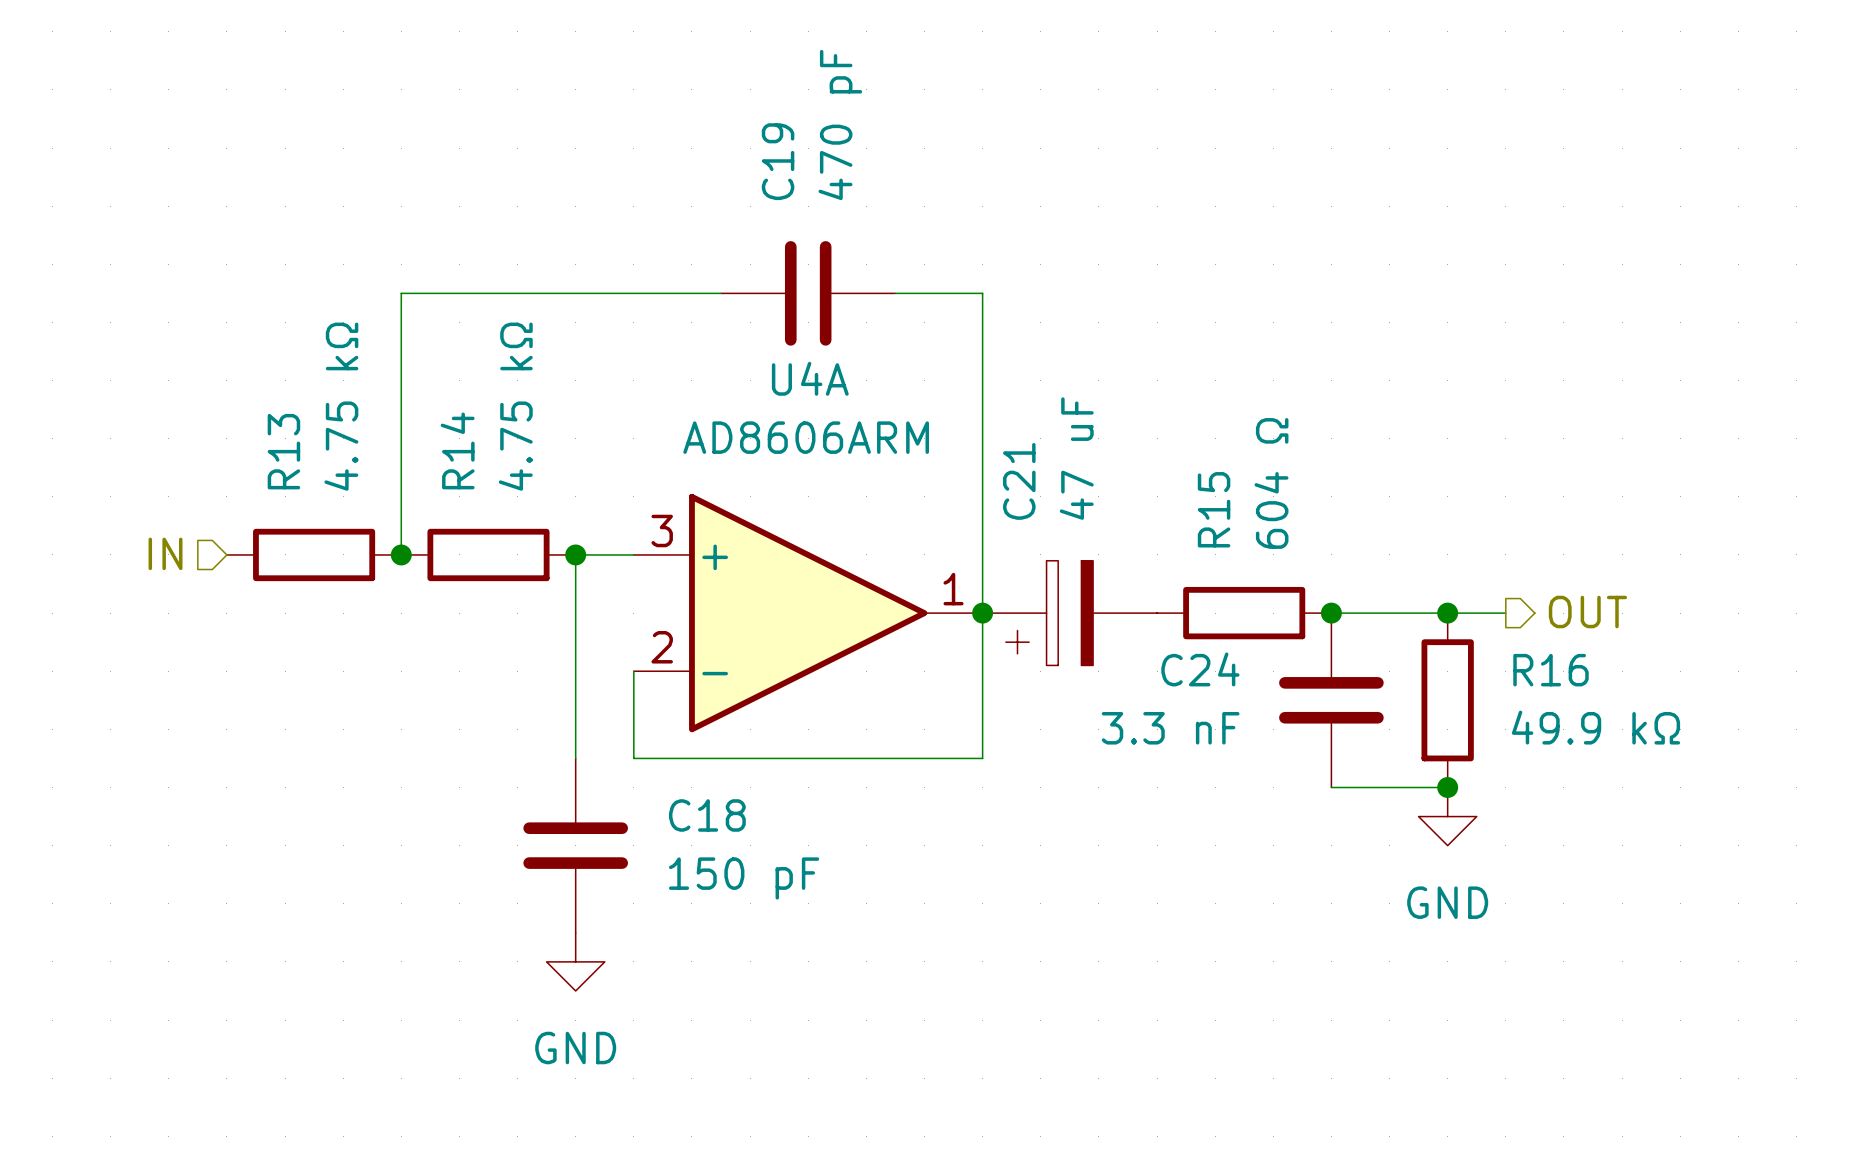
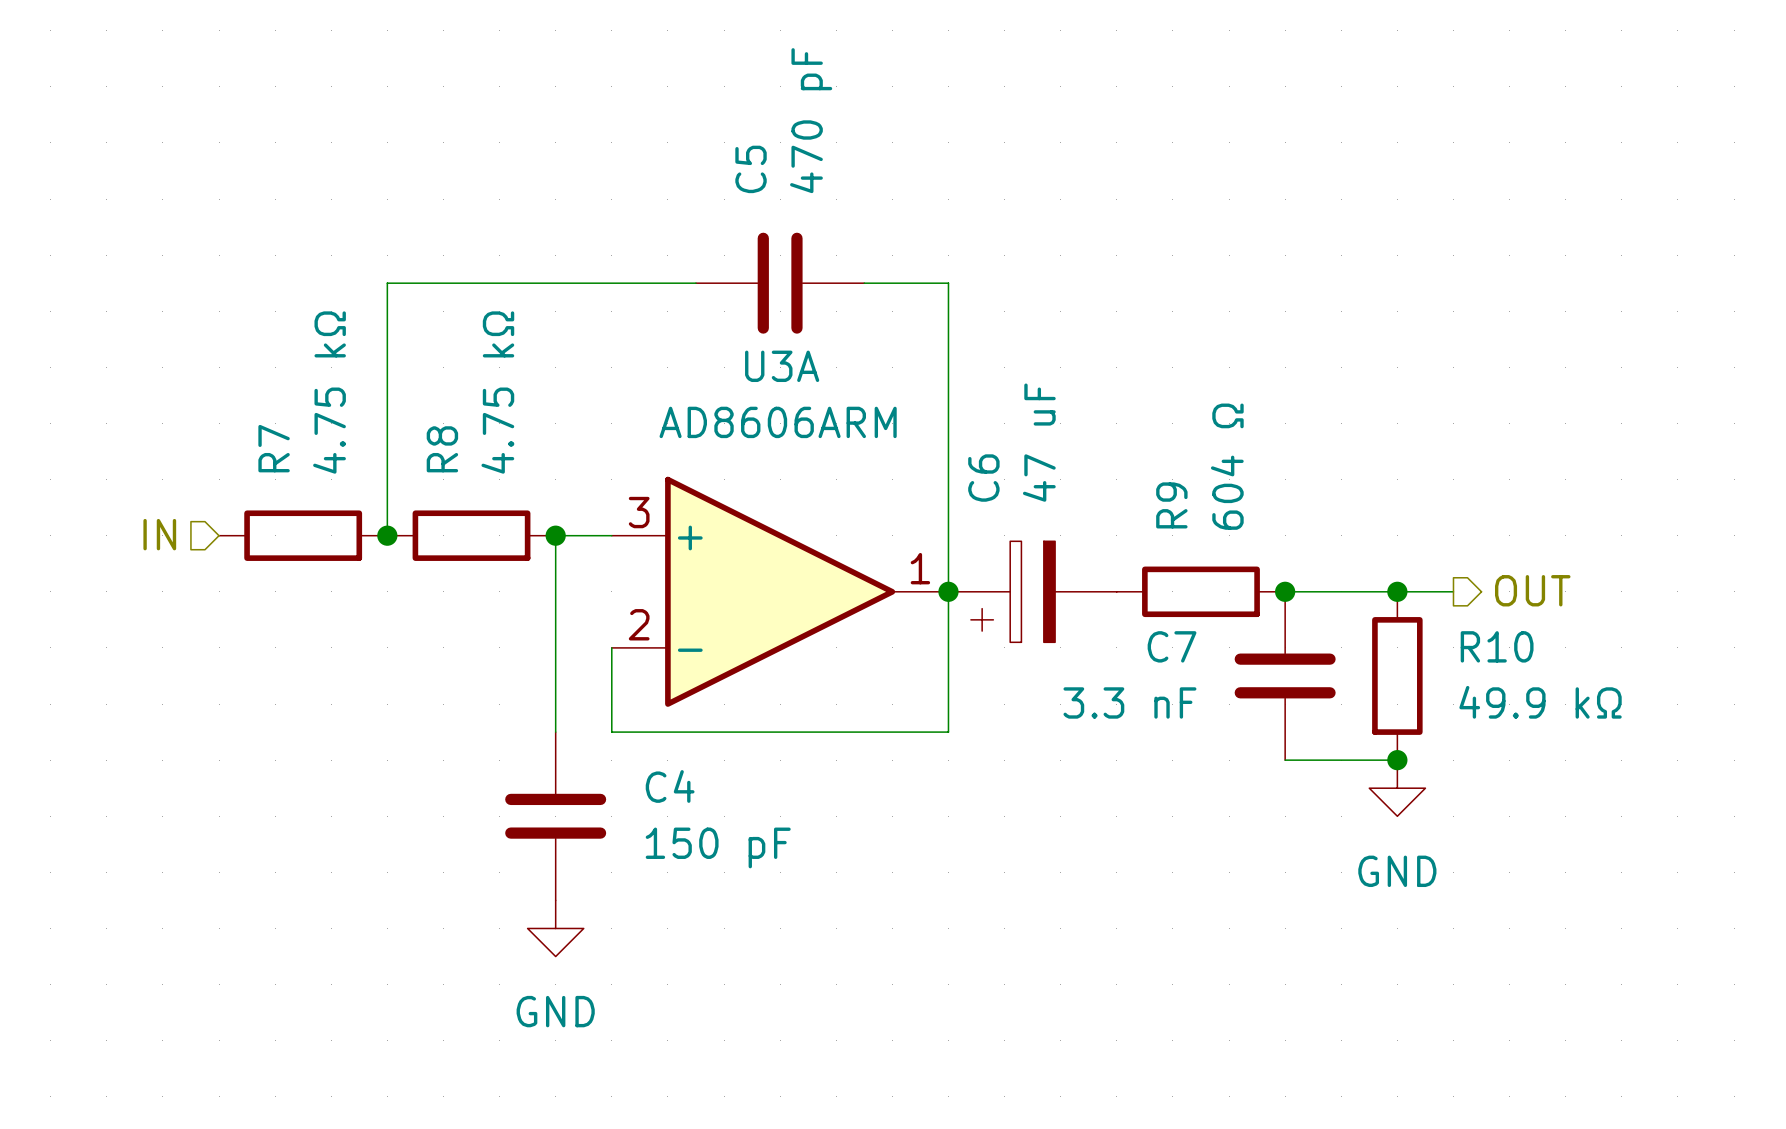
C19 name: C19 (778, 161) -> C5 (751, 169)
U4A name: U4A (810, 378) -> U3A (782, 366)
R14 name: R14 (457, 450) -> R8 (442, 449)
R13 name: R13 (283, 451) -> R7 (274, 448)
C21 name: C21 (1019, 481) -> C6 (983, 478)
R15 name: R15 (1214, 509) -> R9 (1171, 505)
C24 name: C24 (1200, 669) -> C7 (1172, 646)
R16 name: R16 (1551, 670) -> R10 (1497, 646)
C18 name: C18 (707, 815) -> C4 (670, 786)

